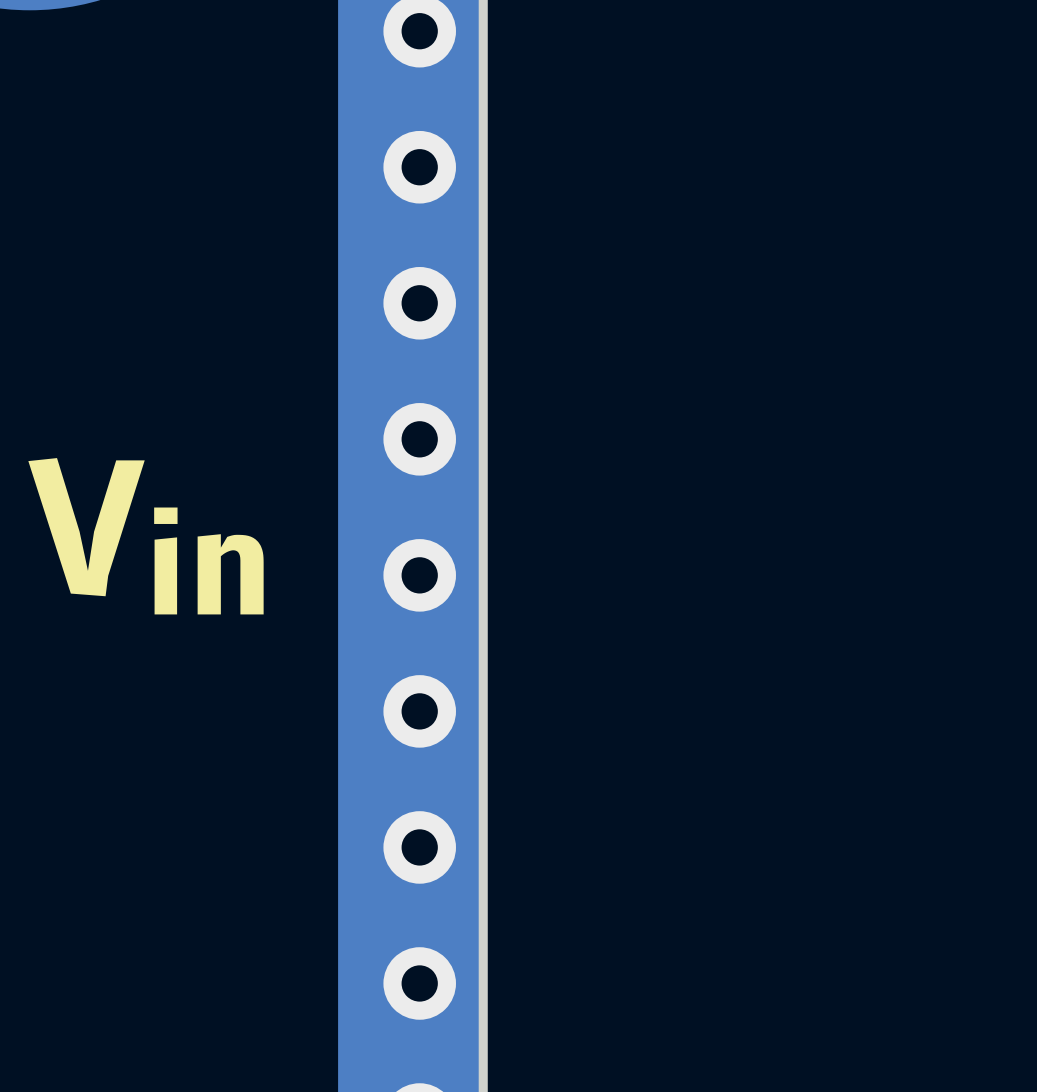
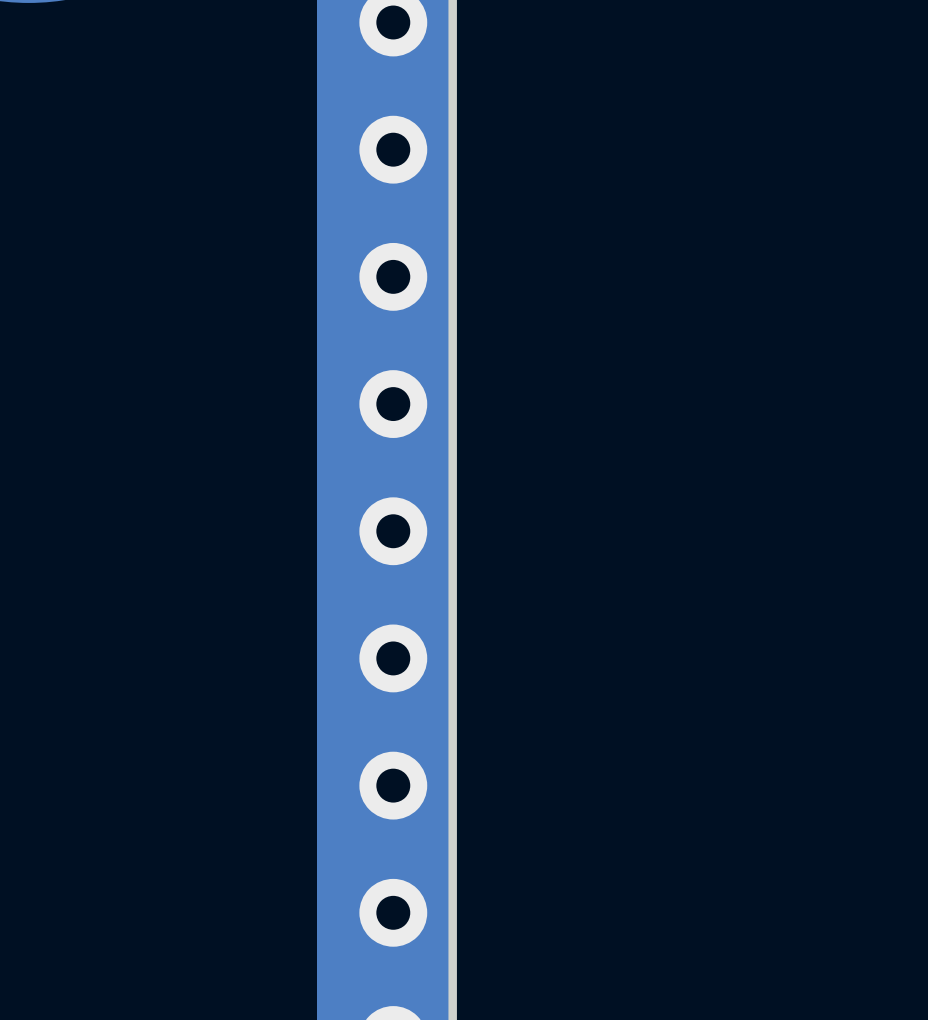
text: Vin (145, 536) -> none

